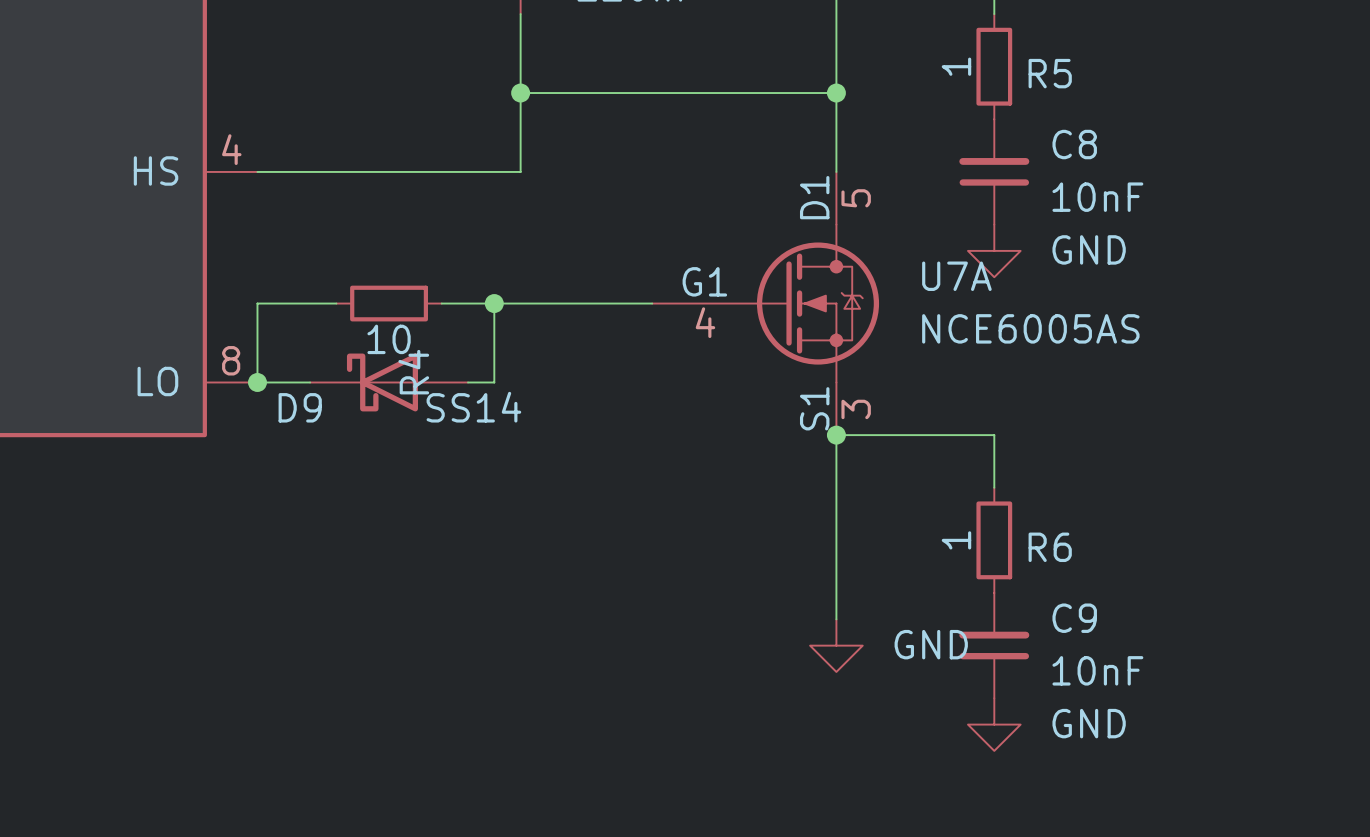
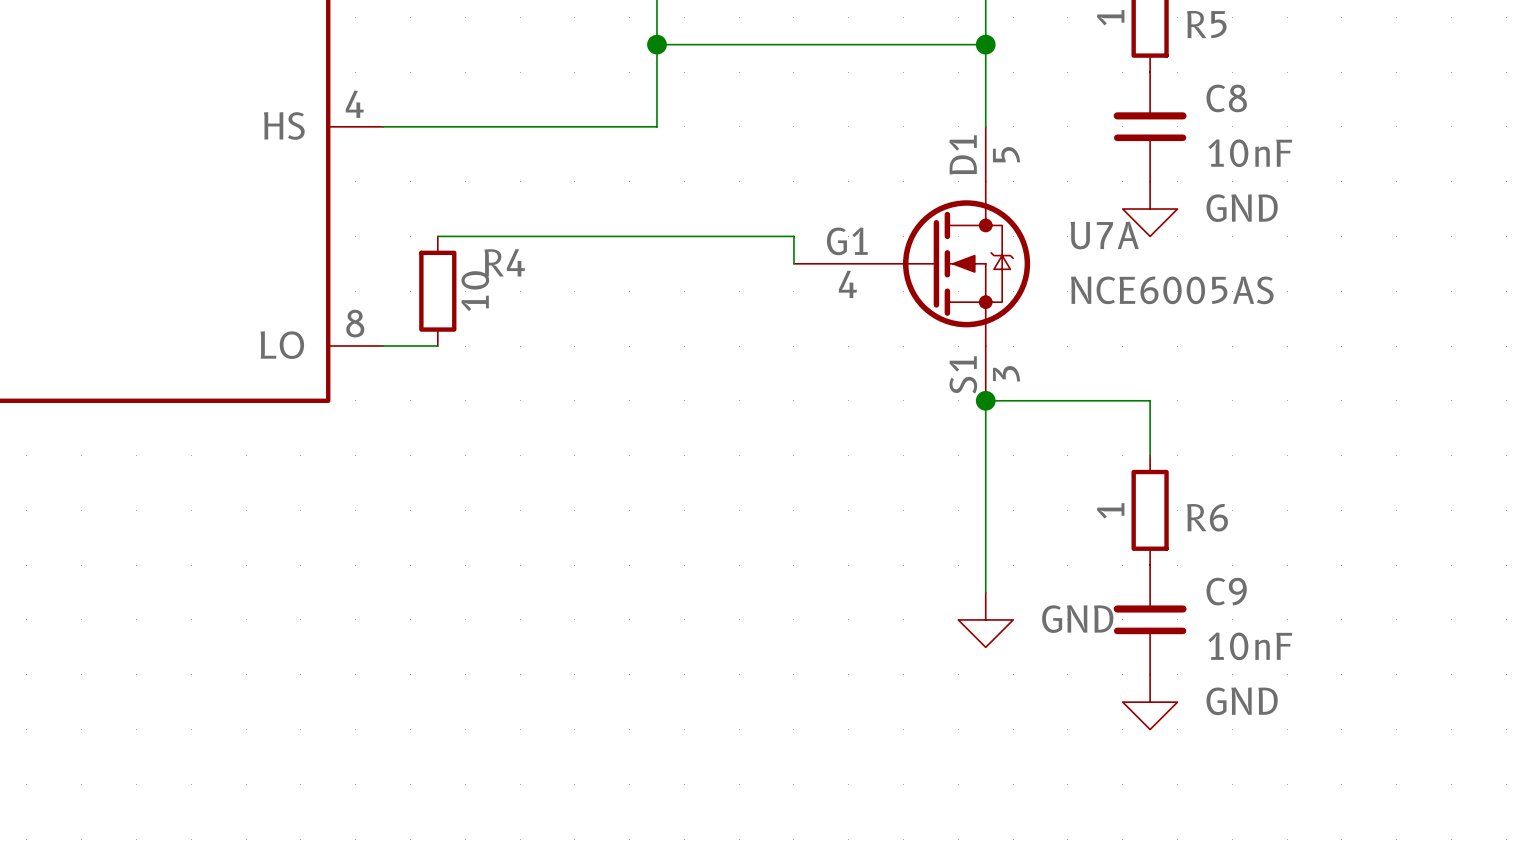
wire: (336, 303) (257, 303) (257, 382) -> none
R4 rotation: 0° (389, 303) -> 90° clockwise (437, 291)
R4 position: (389, 303) -> (437, 291)
wire: (441, 303) (652, 303) -> (437, 236) (793, 236) (793, 263)
wire: (494, 303) (494, 382) (468, 382) -> none
junction: (494, 303) -> none
R4 value position: 10 (389, 339) -> 10 (475, 291)
R4 name position: R4 (413, 372) -> R4 (504, 262)
junction: (257, 382) -> none
D9: SS14 (389, 382) -> none

